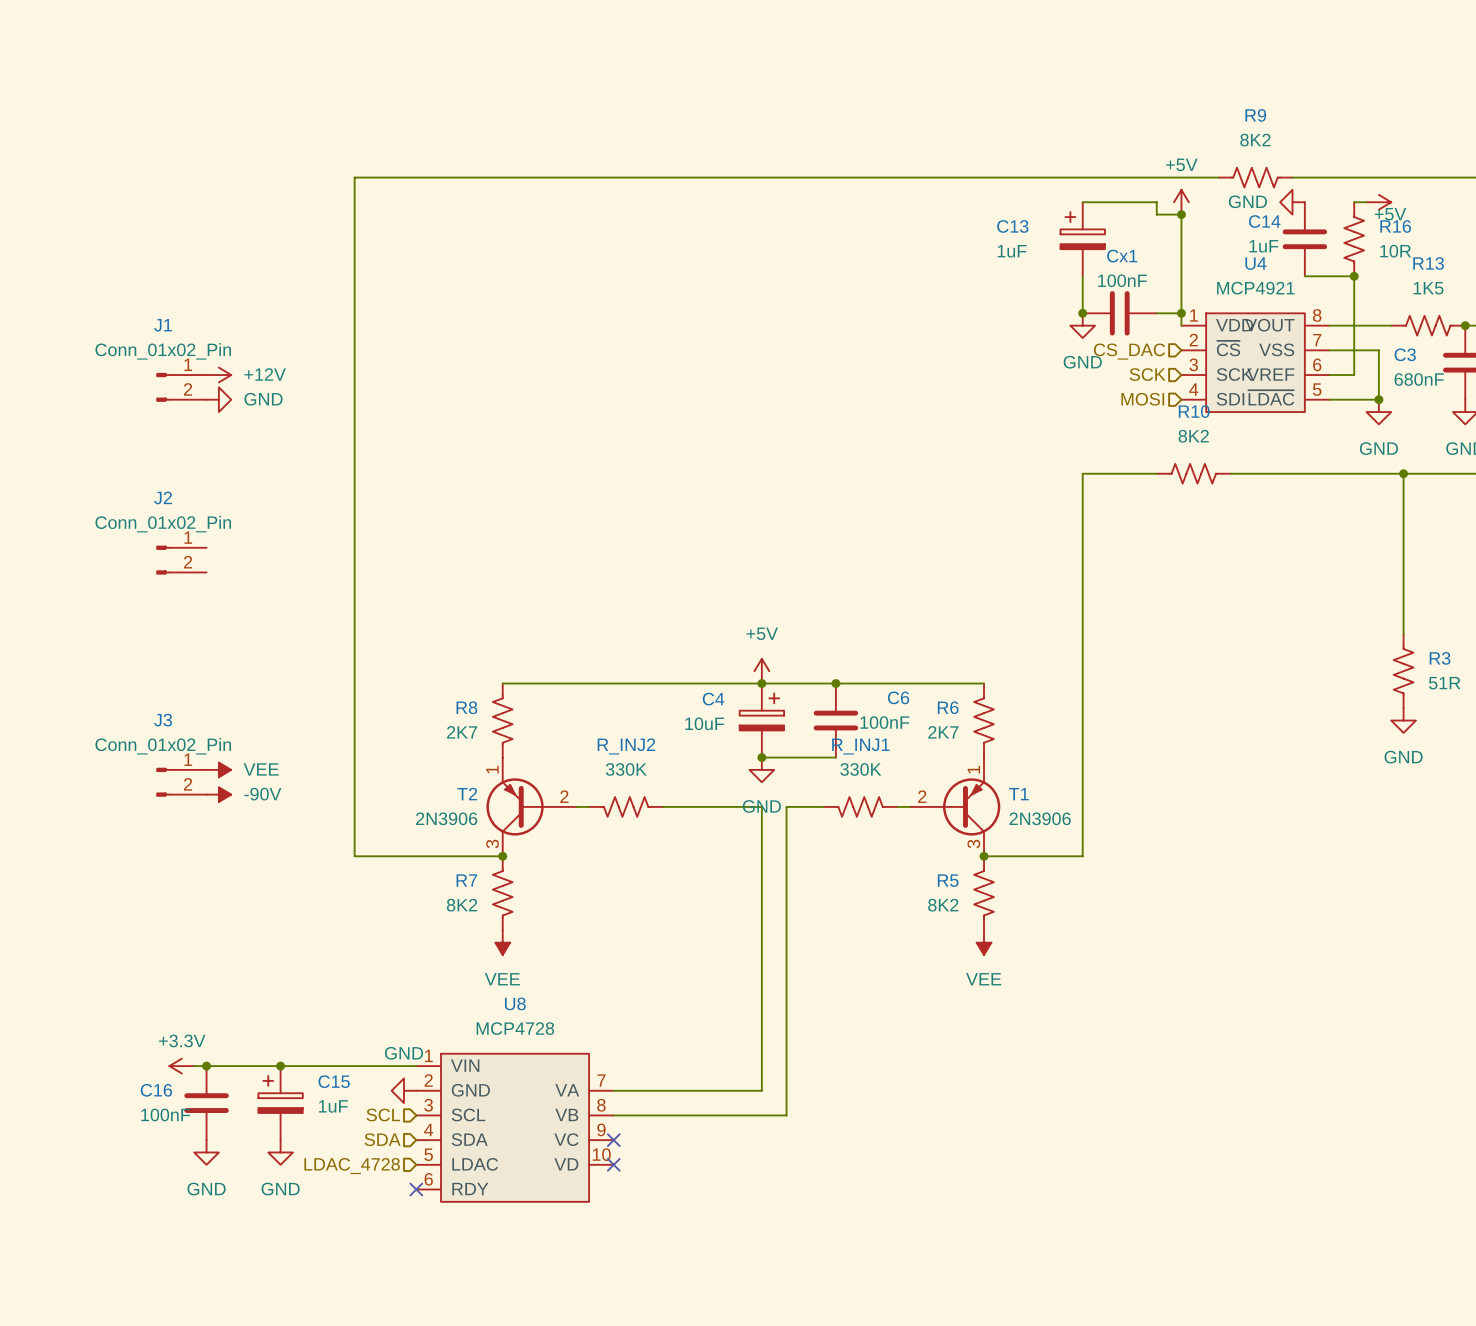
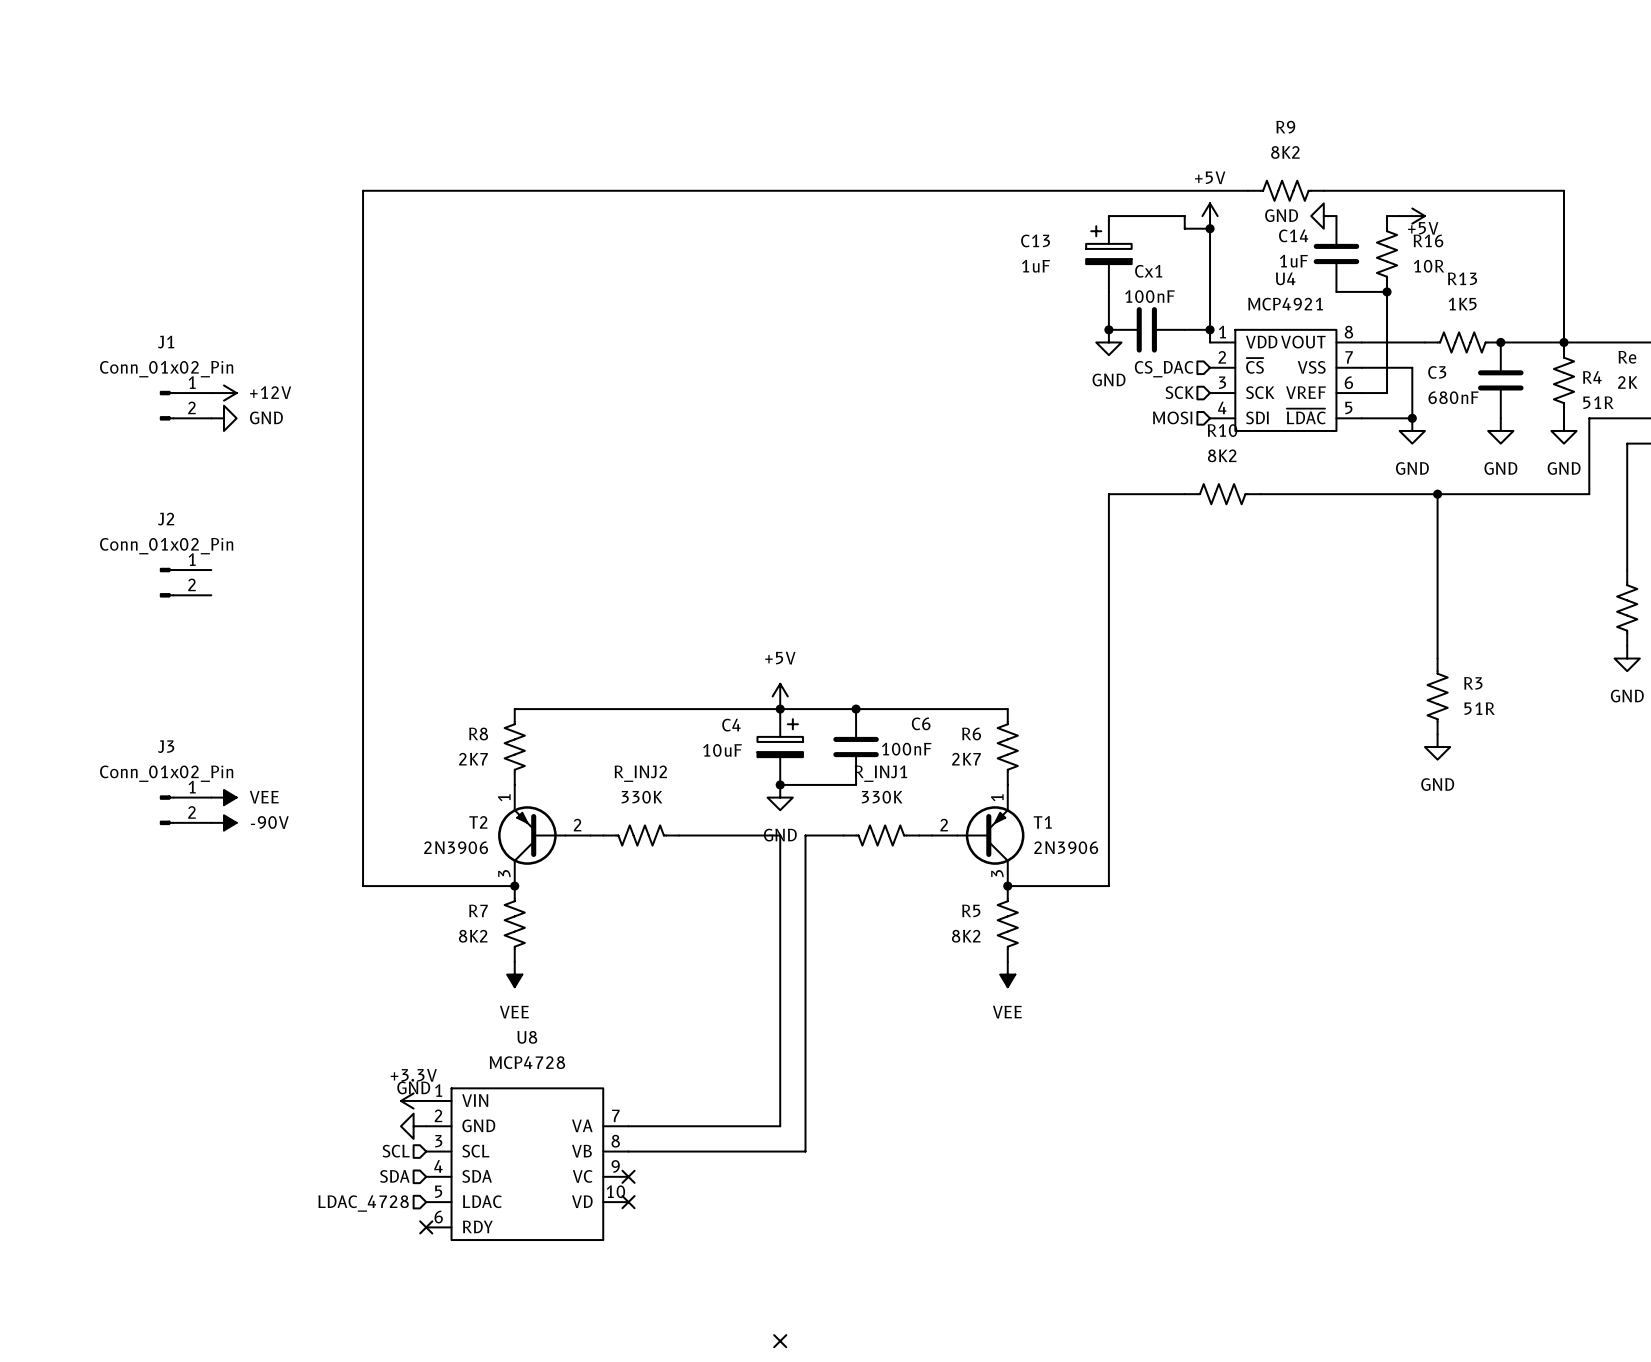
power symbol position: +3.3V (181, 1066) -> +3.3V (413, 1100)
wire: (194, 1066) (416, 1066) -> none
junction: (206, 1066) -> none
junction: (280, 1066) -> none
C16: 100nF (206, 1103) -> none
C15: 1uF (280, 1103) -> none
power symbol: GND (206, 1152) -> none
power symbol: GND (280, 1152) -> none
no-connect mark: none -> (780, 1341)

